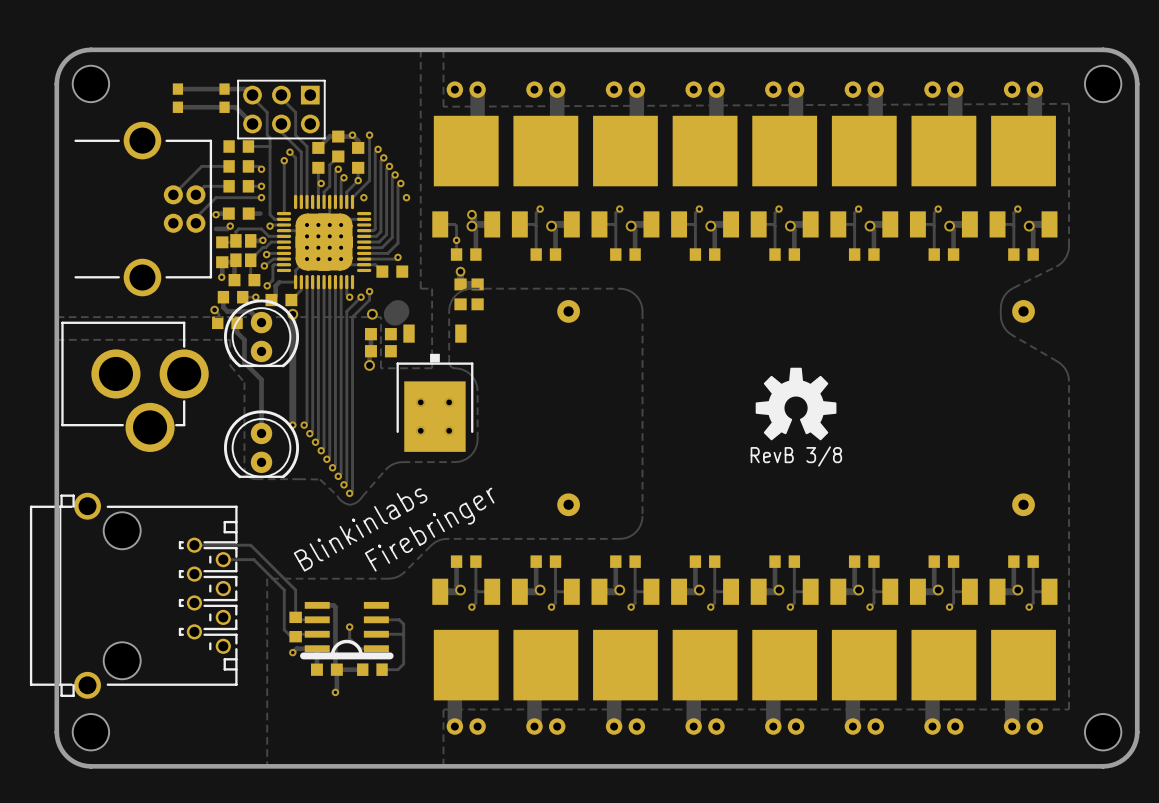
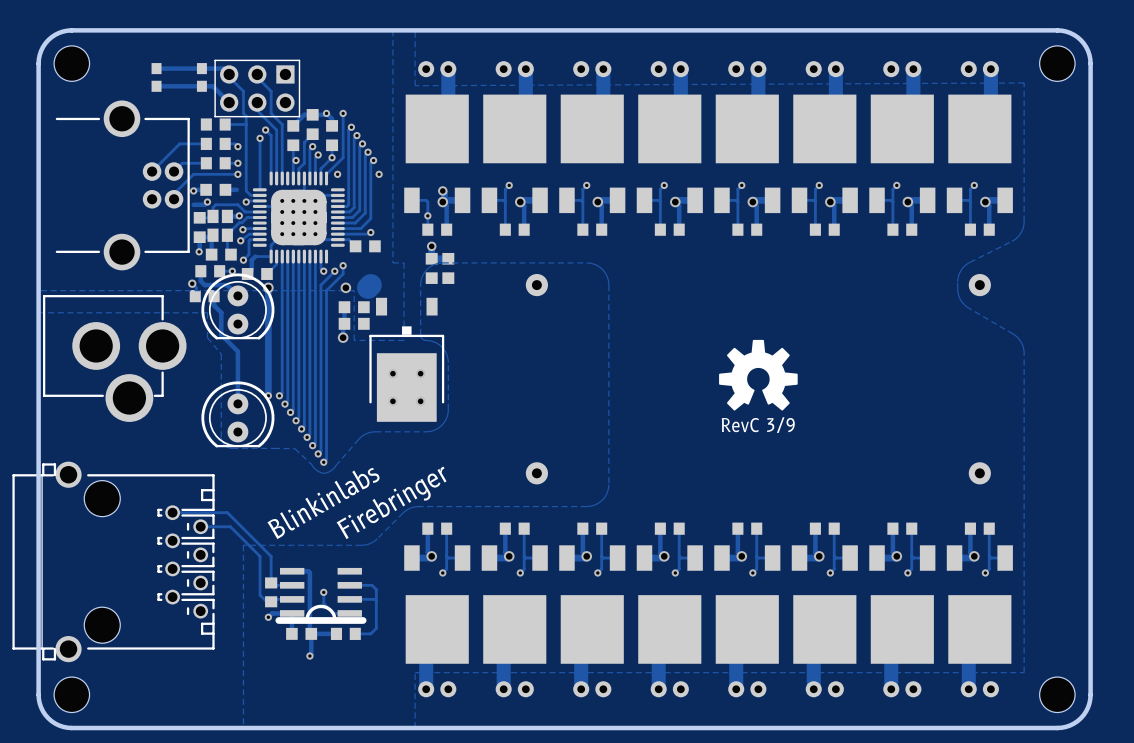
text: RevB 3/8 (796, 456) -> RevC 3/9 (758, 425)

